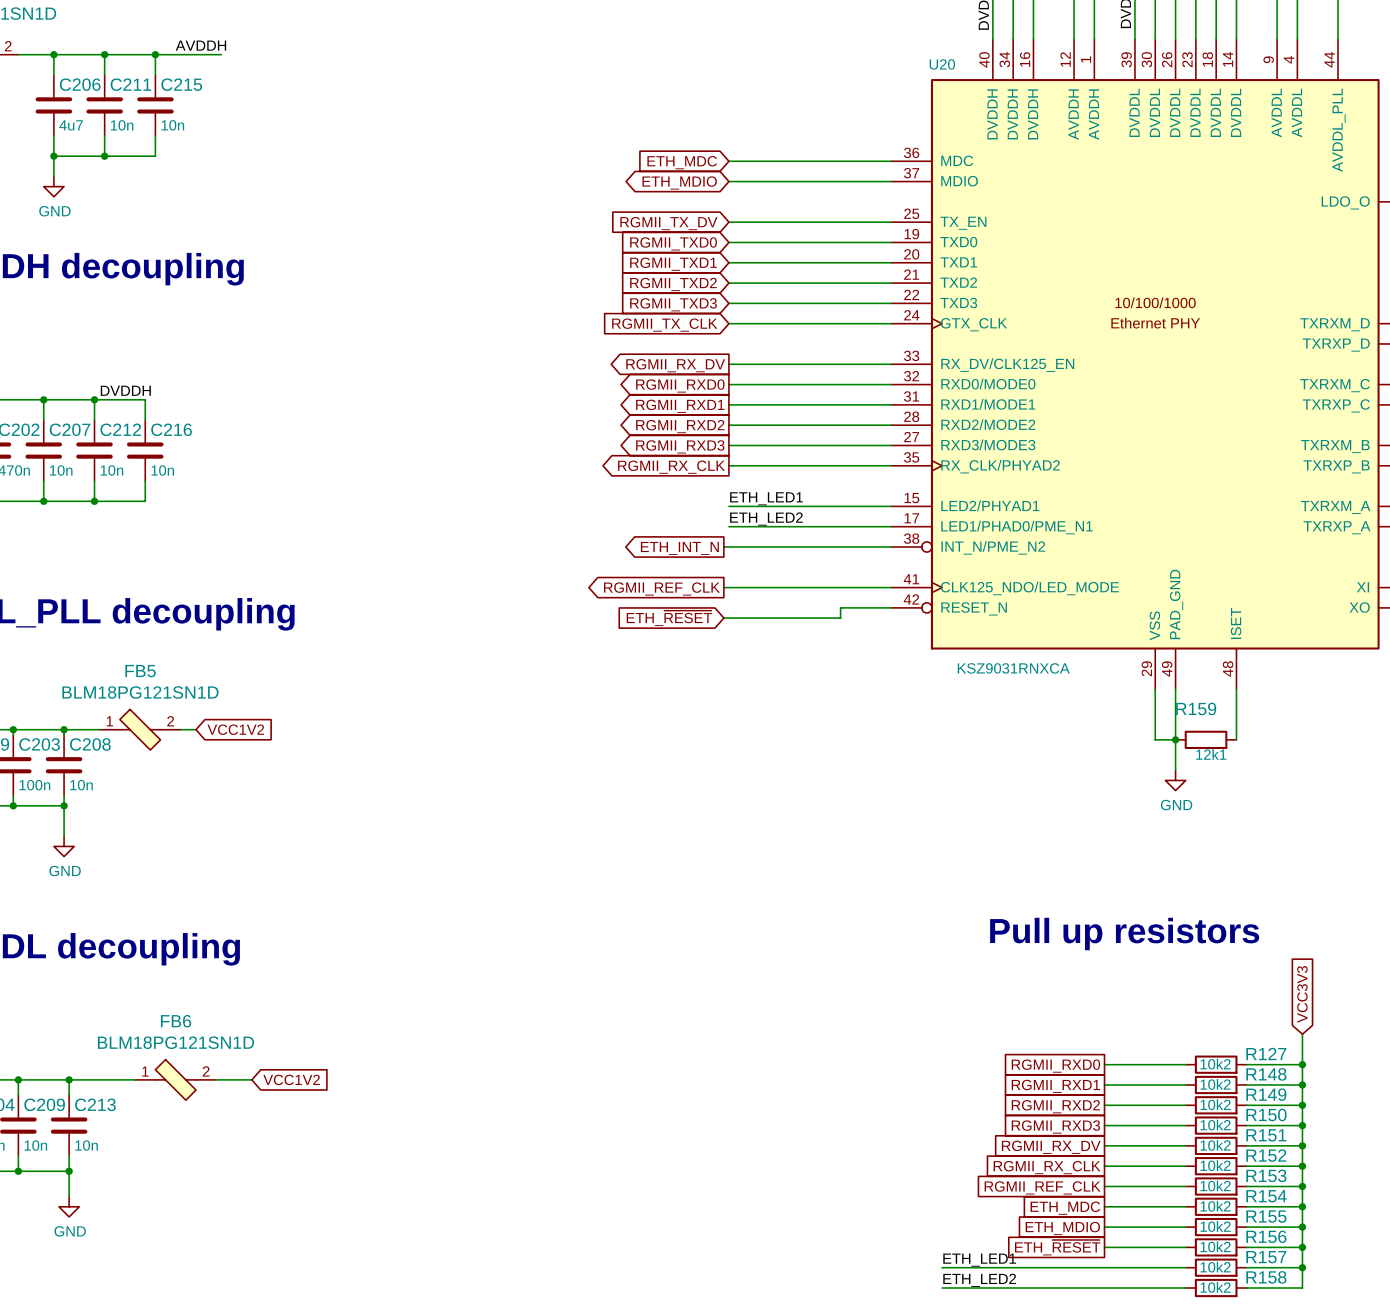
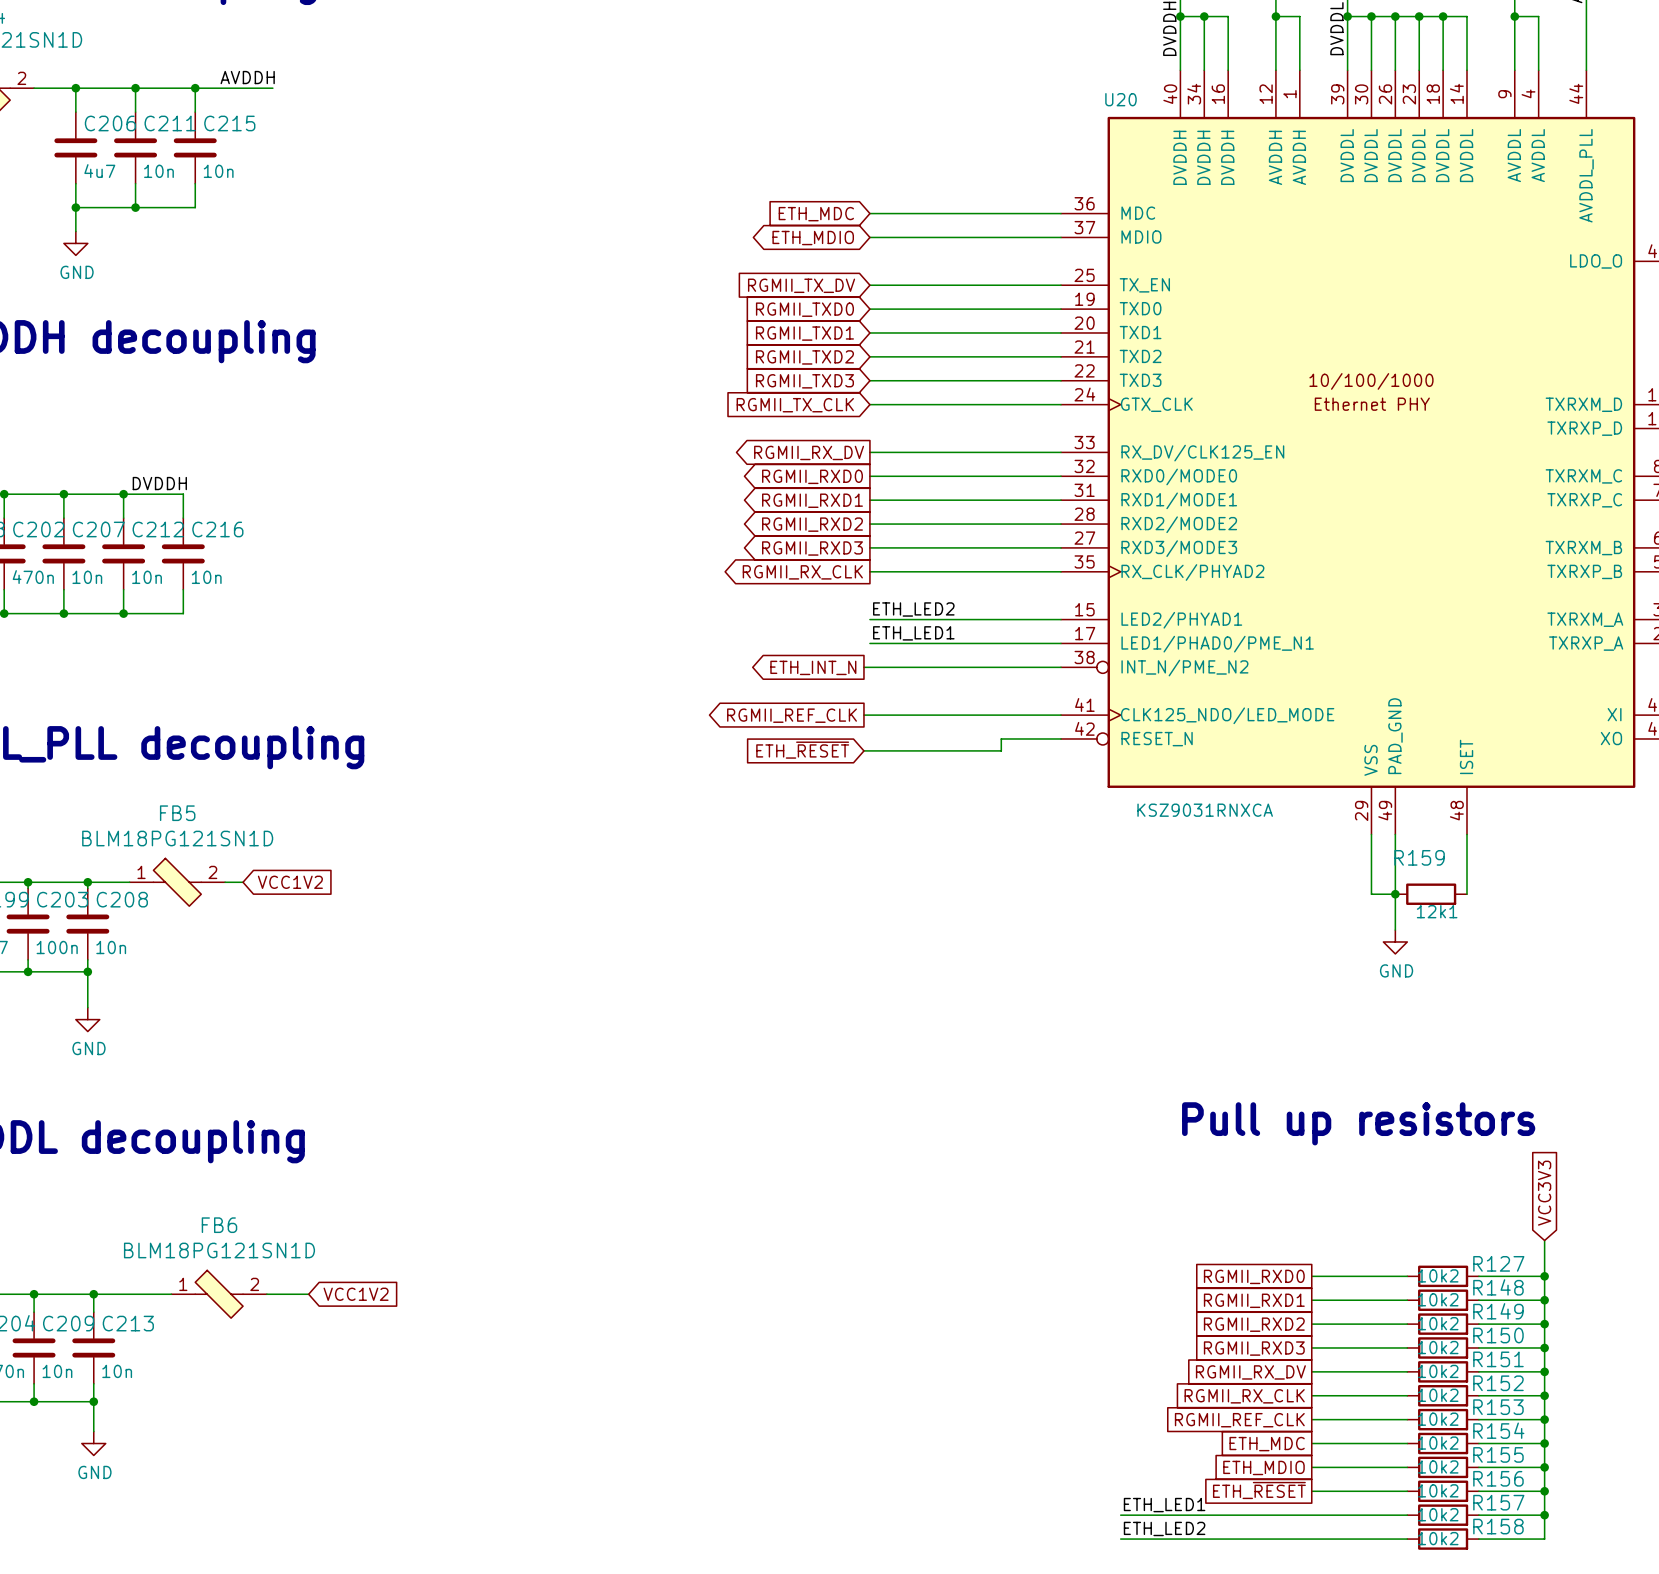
label: ETH_LED1 (766, 498) -> ETH_LED2 (913, 609)
label: ETH_LED2 (766, 519) -> ETH_LED1 (913, 633)

